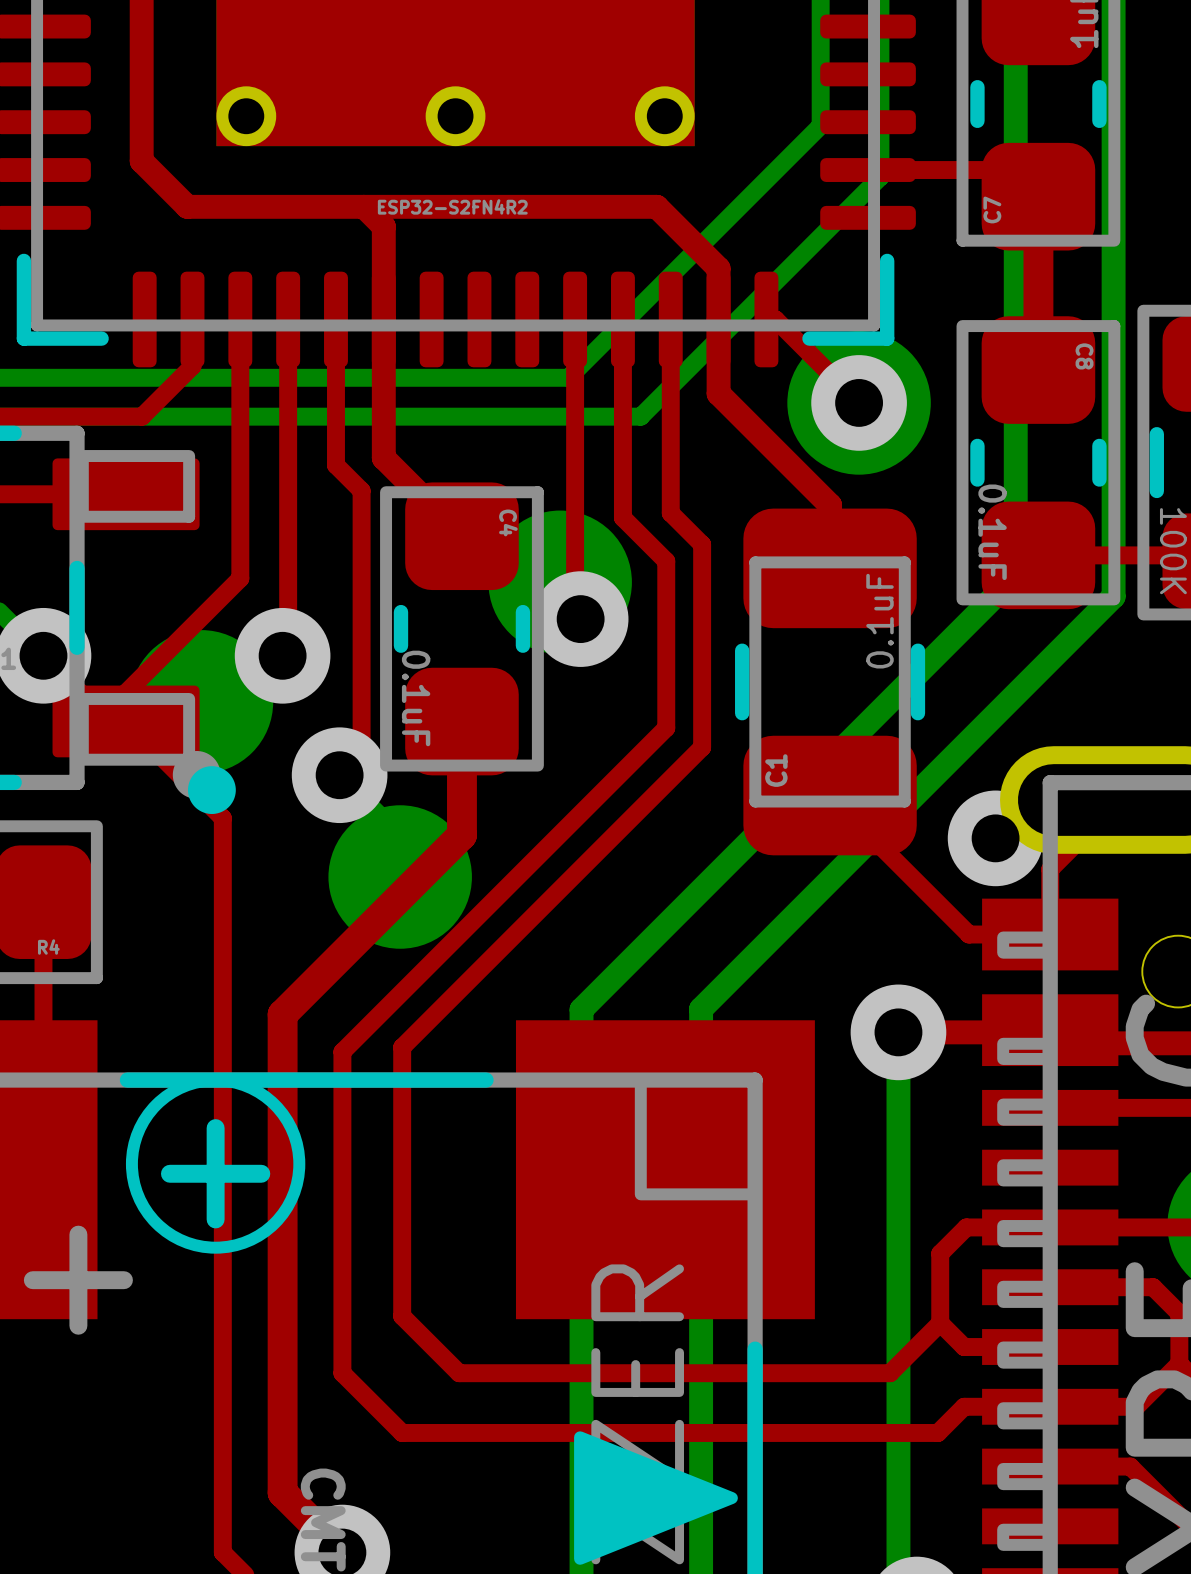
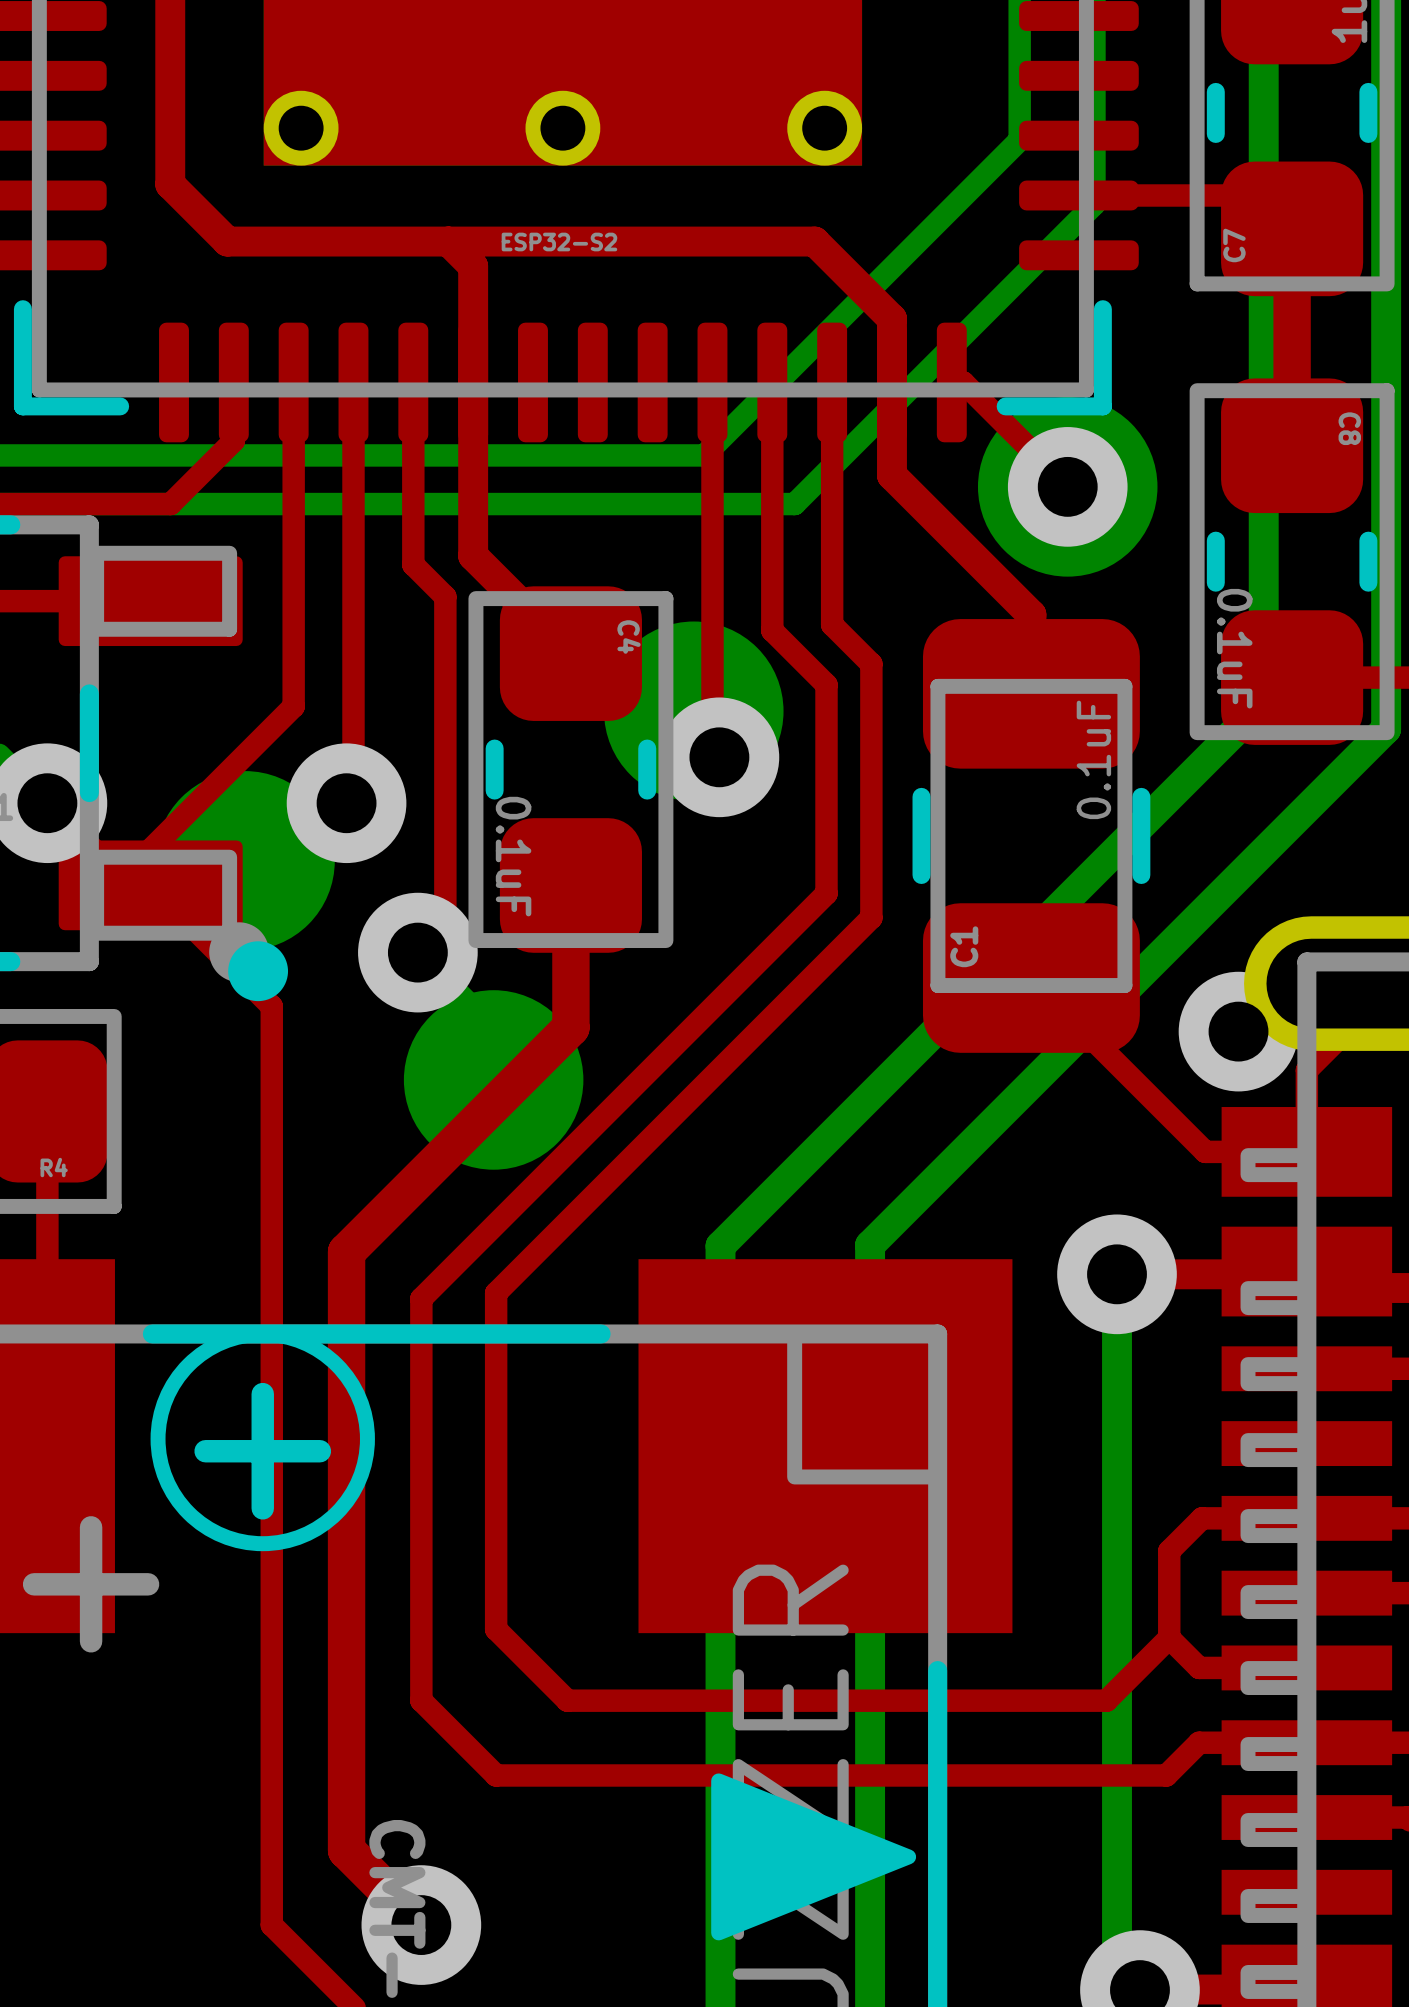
part value: ESP32-S2FN4R2 (452, 206) -> ESP32-S2 (559, 241)

